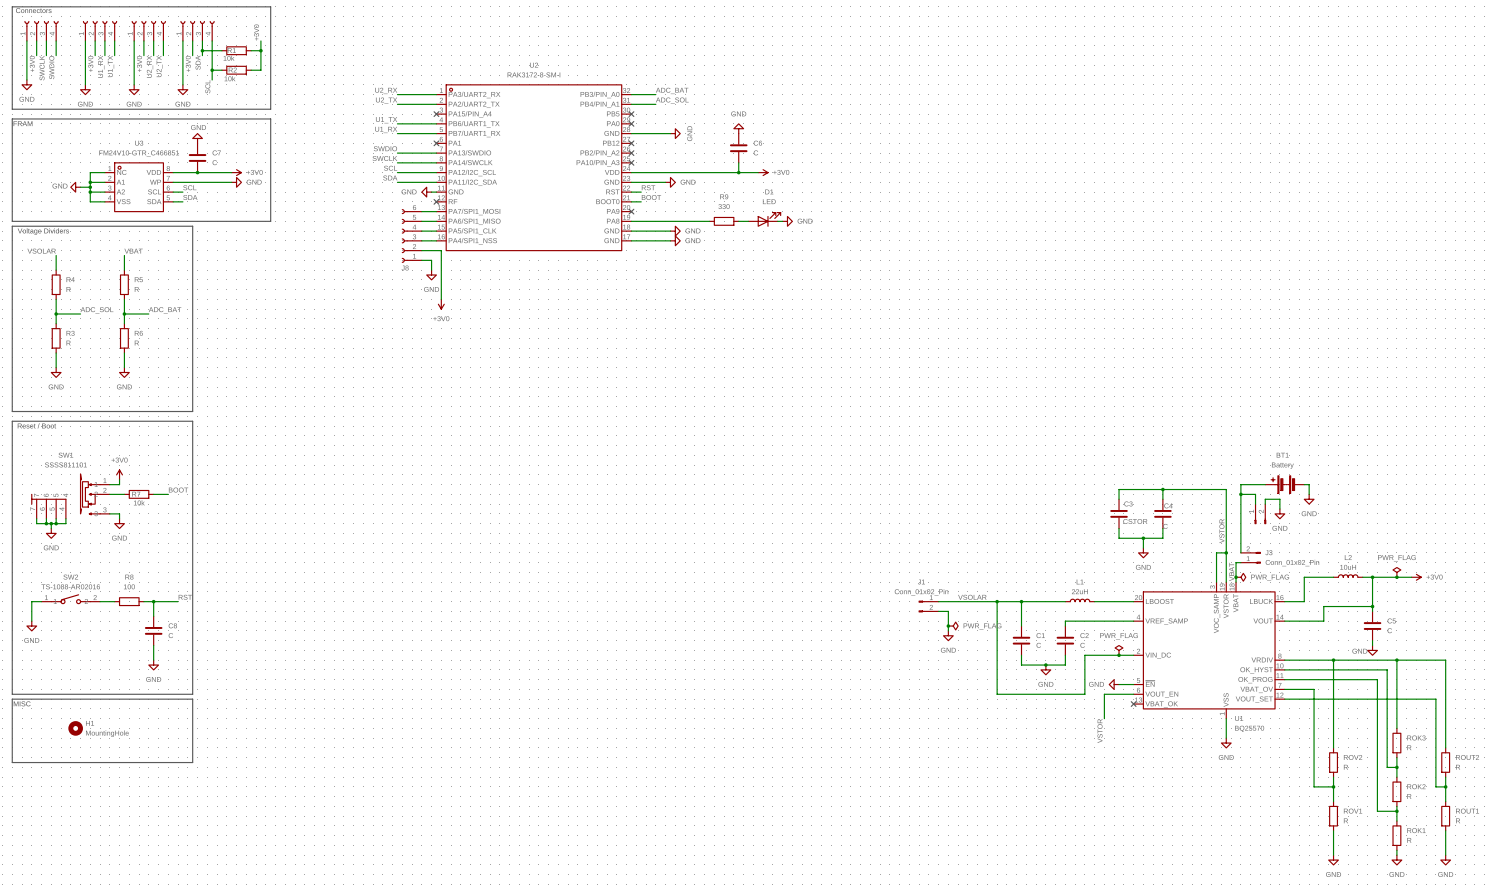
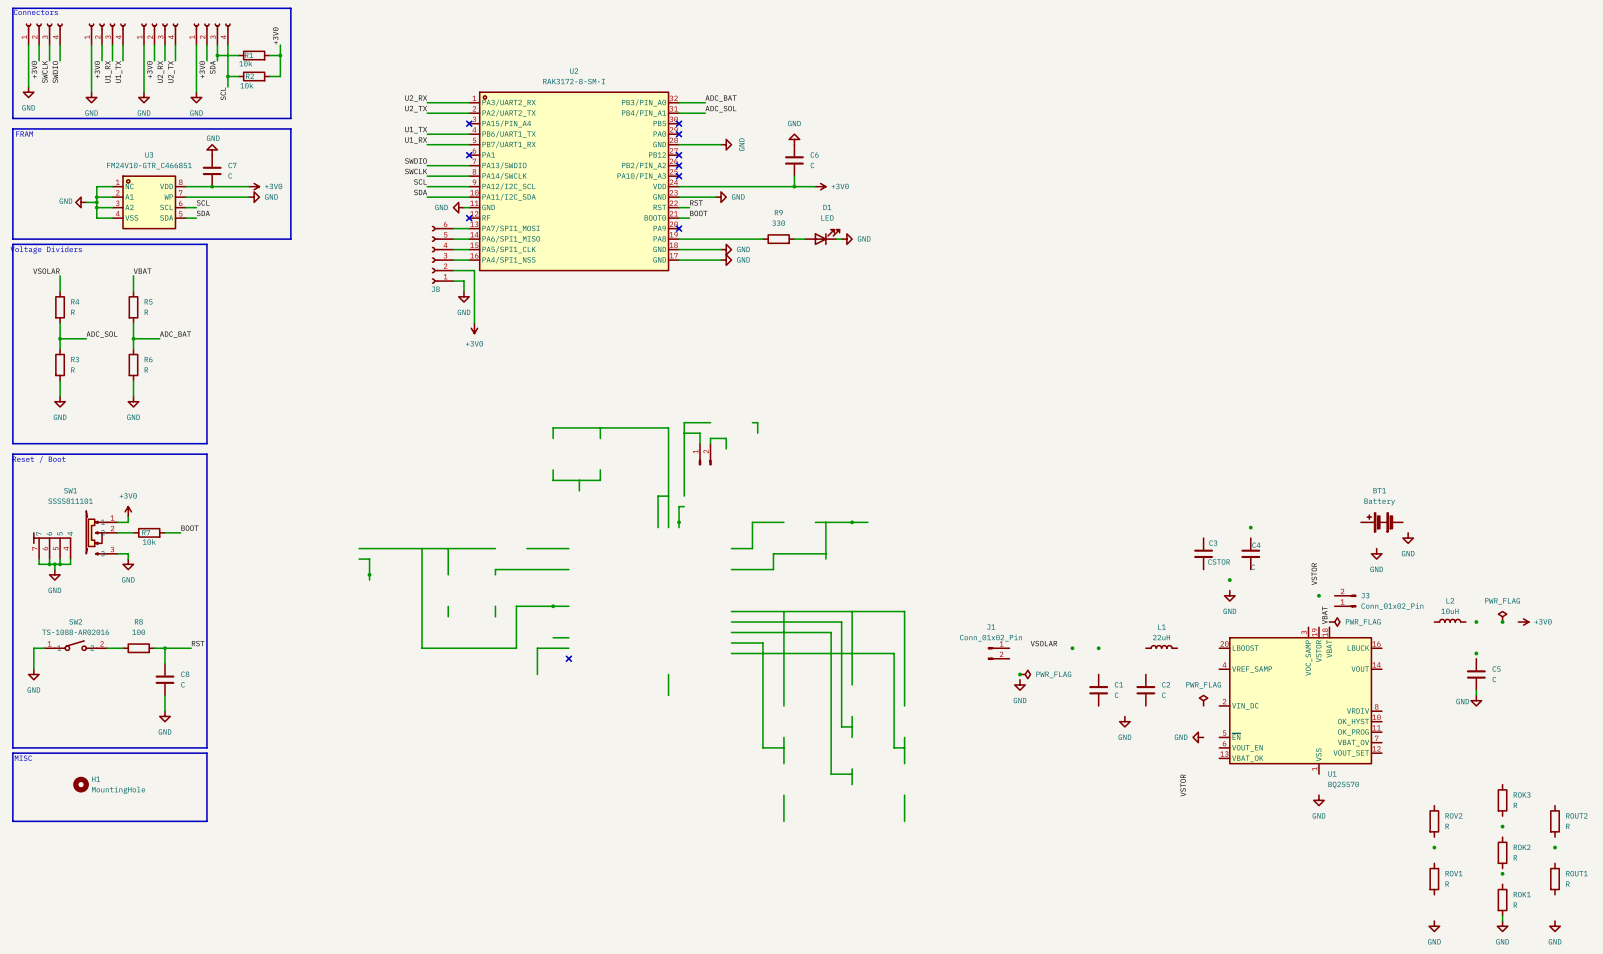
wire: none -> (710, 422) (684, 422) (684, 496)
wire: none -> (752, 422) (757, 422) (757, 433)
wire: none -> (600, 427) (600, 438)
wire: none -> (684, 433) (700, 433) (700, 443)
wire: none -> (553, 438) (553, 427) (668, 427) (668, 527)
wire: none -> (710, 443) (710, 438) (726, 438) (726, 448)
part: none -> (705, 454)
wire: none -> (553, 469) (553, 480) (600, 480) (600, 469)
wire: none -> (579, 480) (579, 490)
wire: none -> (668, 496) (658, 496) (658, 527)
wire: none -> (684, 506) (679, 506) (679, 527)
junction: none -> (679, 522)
wire: none -> (783, 522) (752, 522) (752, 548) (731, 548)
wire: none -> (815, 522) (867, 522)
wire: none -> (825, 522) (825, 559)
junction: none -> (852, 522)
wire: (1265, 484) (1240, 484) (1240, 552) -> none
wire: (1304, 484) (1309, 484) (1309, 494) -> none
wire: (1162, 489) (1162, 499) -> none
wire: (1240, 494) (1255, 494) (1255, 504) -> none
junction: (1240, 494) -> none
wire: (1119, 499) (1119, 489) (1226, 489) (1226, 582) -> none
wire: (1265, 504) (1265, 499) (1279, 499) (1279, 509) -> none
wire: none -> (359, 548) (495, 548)
wire: none -> (422, 548) (422, 648) (516, 648) (516, 606) (568, 606)
wire: none -> (448, 548) (448, 574)
wire: none -> (526, 548) (568, 548)
wire: none -> (825, 553) (773, 553) (773, 569) (731, 569)
part: (1260, 514) -> none
wire: none -> (359, 559) (369, 559) (369, 580)
wire: none -> (568, 569) (495, 569) (495, 574)
wire: (1119, 528) (1119, 538) (1162, 538) (1162, 528) -> none
junction: none -> (369, 574)
wire: (1143, 538) (1143, 548) -> none
wire: (1226, 552) (1216, 552) (1216, 582) -> none
wire: none -> (448, 606) (448, 616)
wire: none -> (495, 606) (495, 616)
junction: none -> (553, 606)
wire: (1240, 562) (1236, 562) (1236, 582) -> none
wire: none -> (731, 611) (904, 611) (904, 705)
wire: none -> (783, 611) (783, 705)
wire: none -> (852, 611) (852, 684)
wire: none -> (731, 622) (841, 622) (841, 726) (852, 726)
junction: (1236, 577) -> none
wire: (1333, 577) (1304, 577) (1304, 601) (1284, 601) -> none
wire: (1362, 577) (1411, 577) -> none
wire: (1372, 577) (1372, 611) -> none
wire: none -> (731, 632) (831, 632) (831, 774) (852, 774)
wire: none -> (553, 637) (568, 637)
wire: none -> (731, 643) (762, 643) (762, 747) (783, 747)
wire: none -> (568, 648) (537, 648) (537, 674)
wire: (938, 601) (1065, 601) -> none
wire: (997, 601) (997, 694) (1084, 694) (1084, 655) (1133, 655) -> none
wire: (1021, 601) (1021, 626) -> none
wire: (1094, 601) (1133, 601) -> none
wire: none -> (731, 653) (894, 653) (894, 747) (904, 747)
wire: (1372, 606) (1323, 606) (1323, 621) (1284, 621) -> none
no-connect mark: none -> (568, 658)
wire: (938, 611) (948, 611) (948, 630) -> none
wire: (1133, 621) (1065, 621) (1065, 626) -> none
wire: none -> (668, 674) (668, 695)
wire: (1021, 655) (1021, 665) (1065, 665) (1065, 655) -> none
junction: (1119, 655) -> none
wire: (1284, 660) (1445, 660) (1445, 747) -> none
wire: (1333, 660) (1333, 747) -> none
junction: (1333, 660) -> none
wire: (1396, 660) (1396, 728) -> none
junction: (1396, 660) -> none
wire: none -> (852, 716) (852, 737)
junction: (1045, 665) -> none
wire: (1284, 669) (1387, 669) (1387, 767) (1396, 767) -> none
wire: (1284, 679) (1377, 679) (1377, 811) (1396, 811) -> none
wire: none -> (783, 737) (783, 763)
wire: none -> (904, 737) (904, 763)
wire: (1119, 684) (1133, 684) -> none
wire: (1284, 689) (1314, 689) (1314, 786) (1333, 786) -> none
wire: (1133, 694) (1104, 694) (1104, 718) -> none
wire: (1284, 699) (1435, 699) (1435, 786) (1445, 786) -> none
no-connect mark: (1133, 704) -> none
wire: none -> (852, 768) (852, 784)
wire: (1226, 718) (1226, 738) -> none
wire: none -> (783, 795) (783, 821)
wire: none -> (904, 795) (904, 821)
wire: (1396, 757) (1396, 777) -> none
wire: (1333, 777) (1333, 801) -> none
wire: (1445, 777) (1445, 801) -> none
wire: (1396, 806) (1396, 821) -> none
wire: (1333, 830) (1333, 855) -> none
wire: (1445, 830) (1445, 855) -> none

